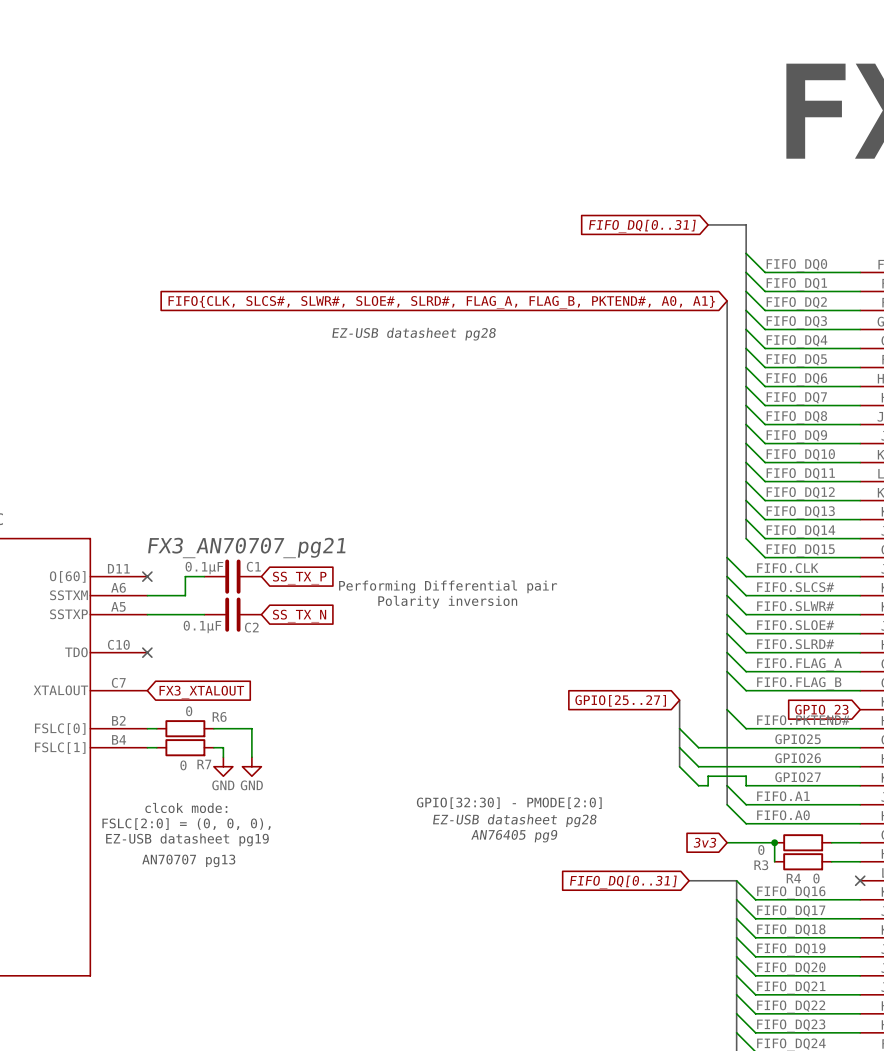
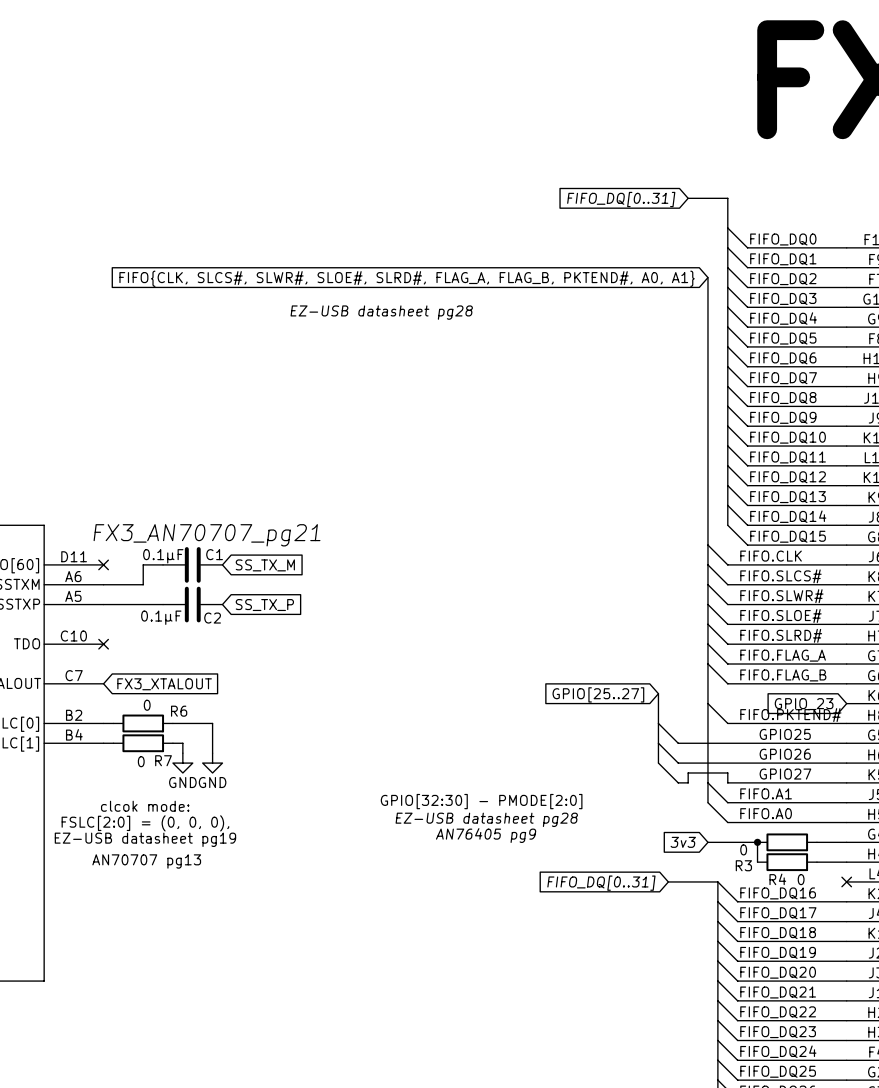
global label: SS_TX_P (299, 578) -> SS_TX_M (265, 565)
text: Performing Differential pair (448, 586) -> none
text: Polarity inversion (447, 602) -> none
global label: SS_TX_N (299, 616) -> SS_TX_P (264, 605)

